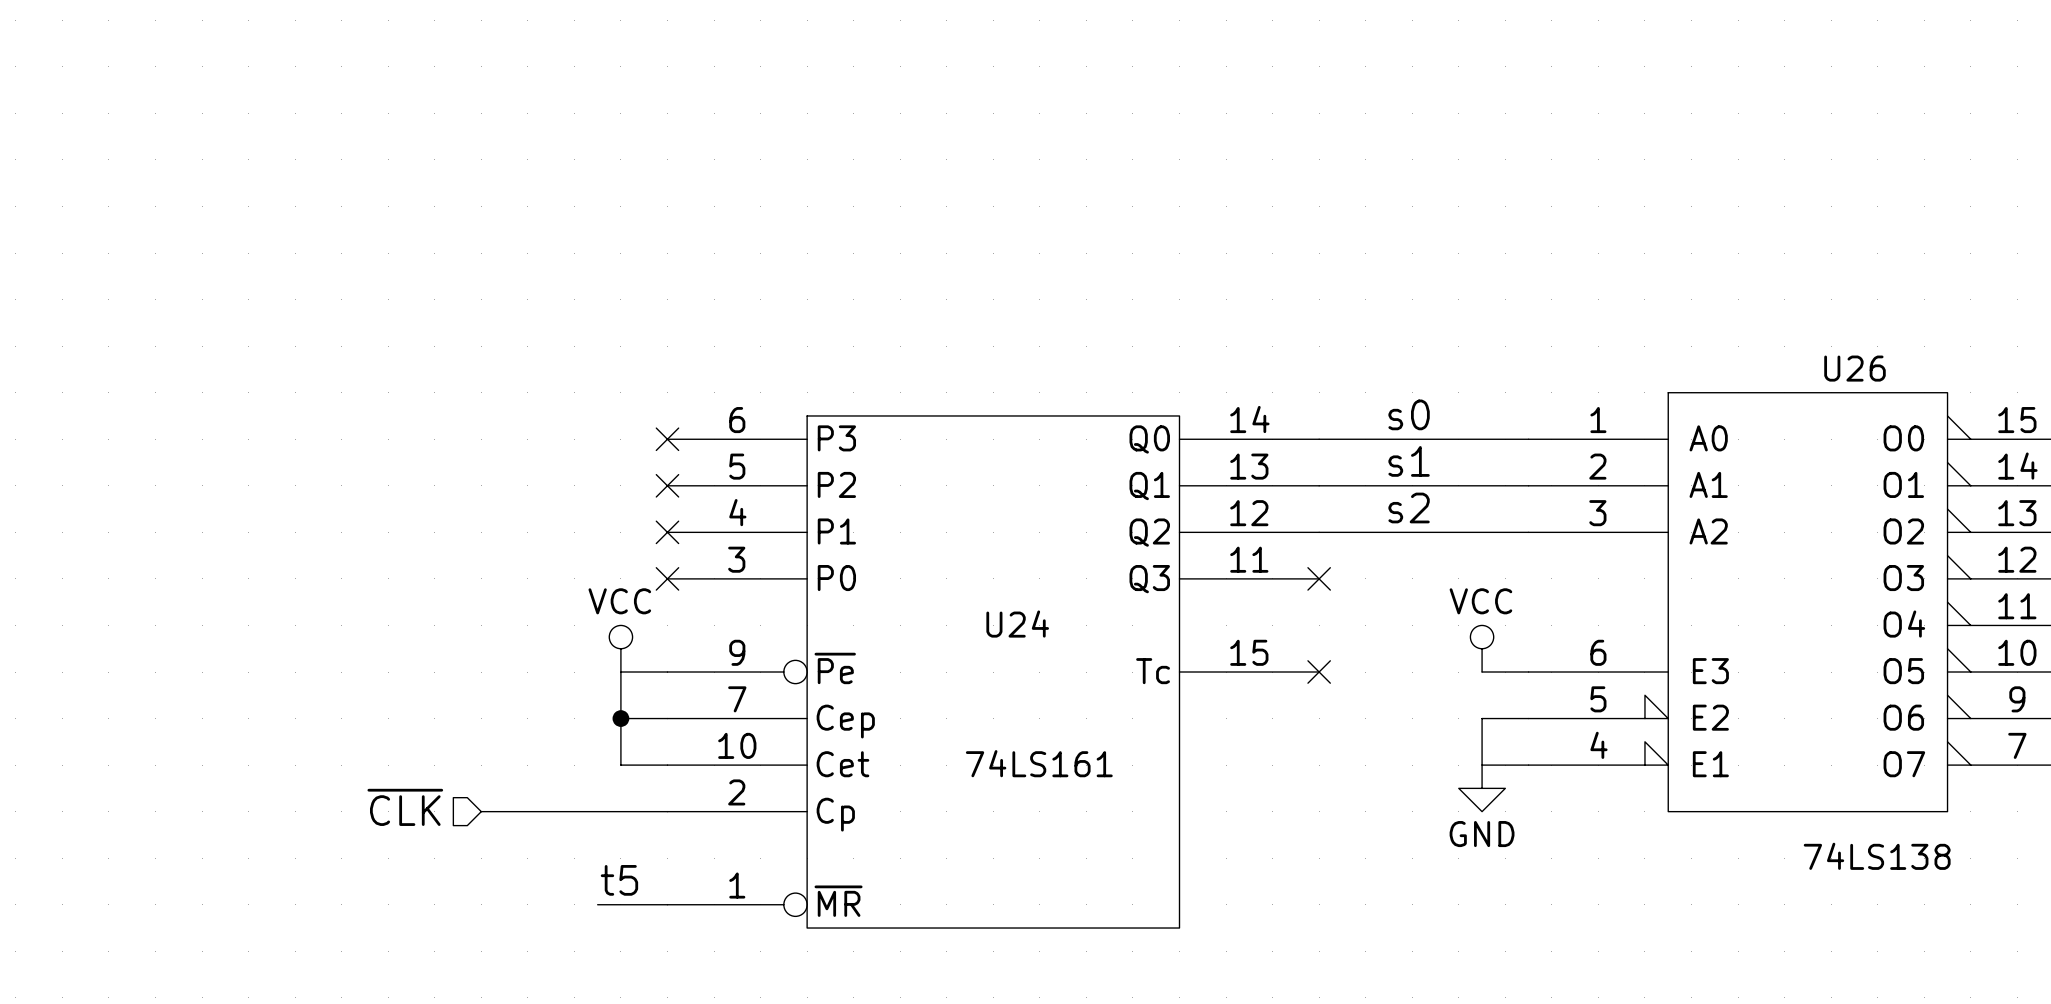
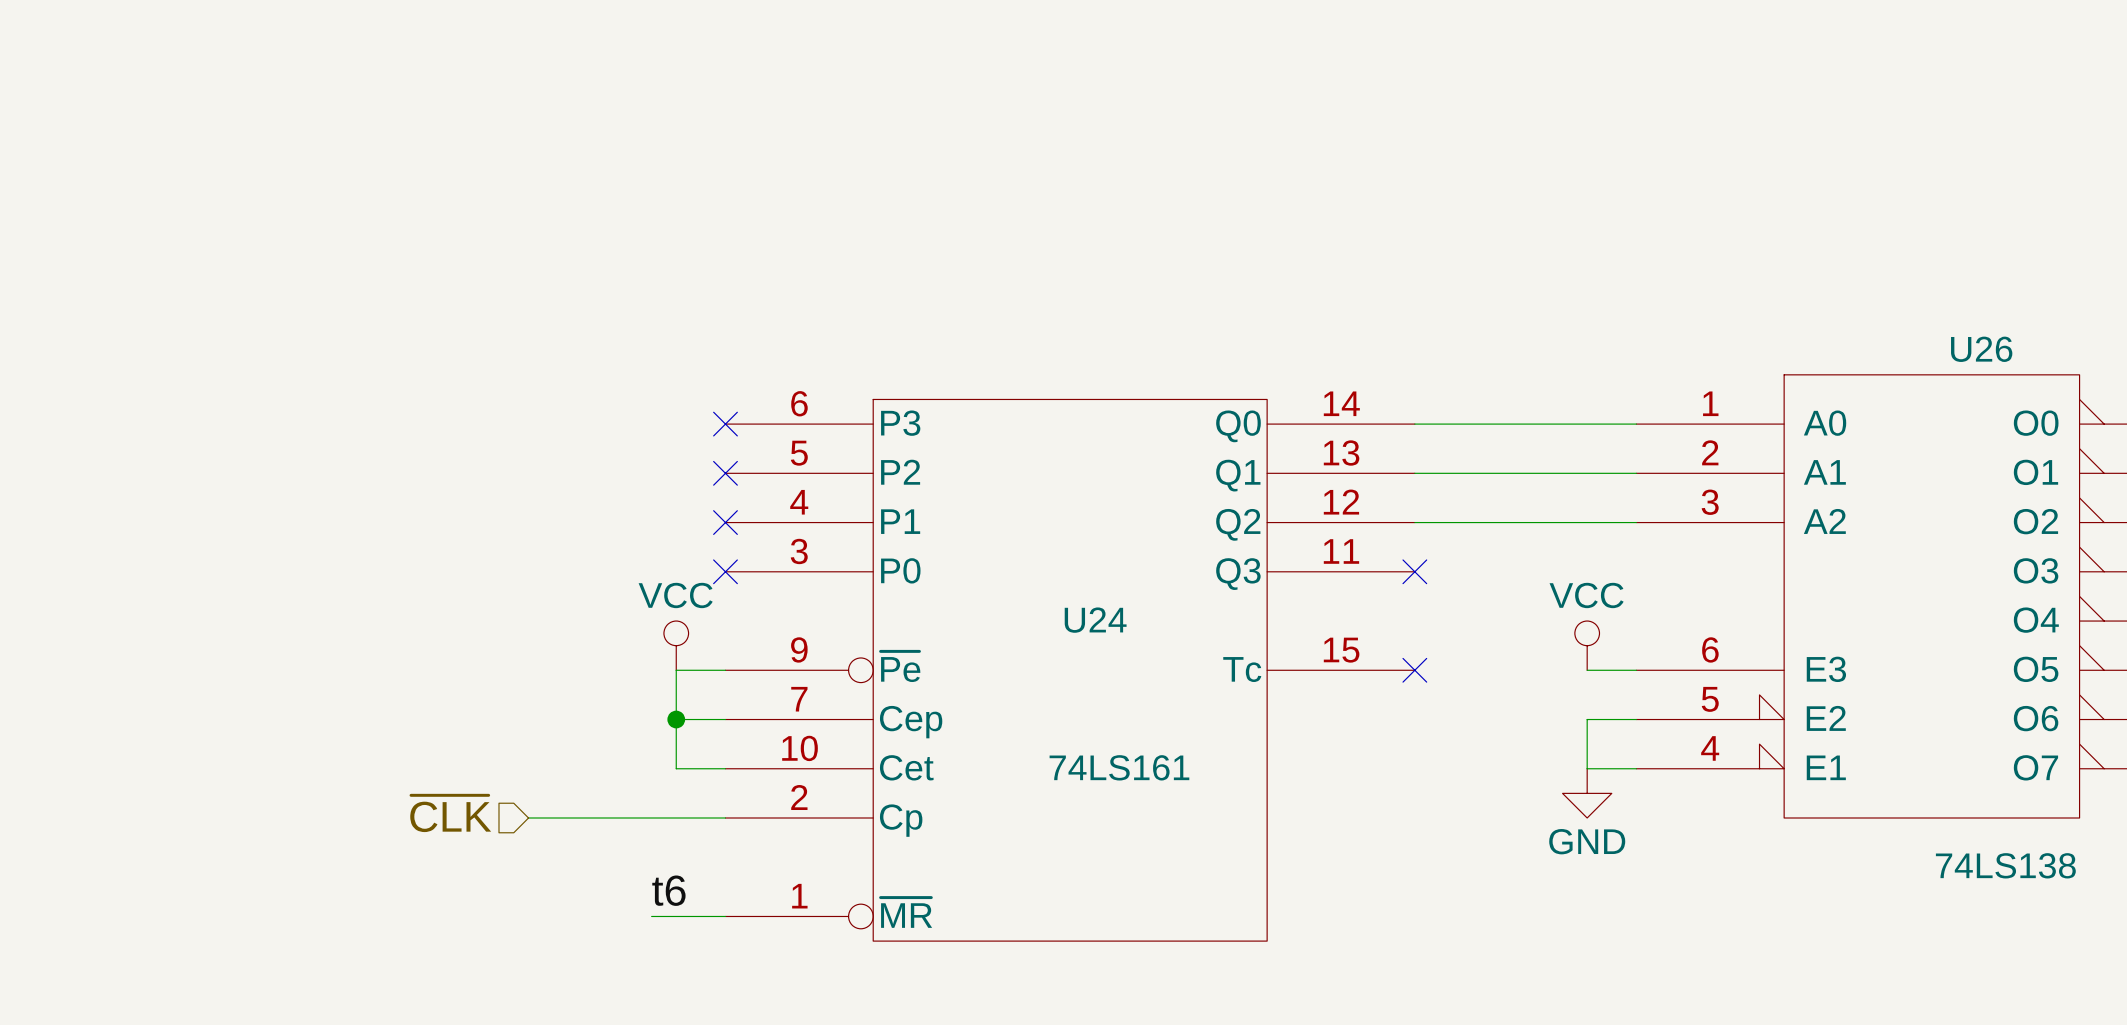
label: s0 (1409, 414) -> none
label: s1 (1409, 461) -> none
label: s2 (1409, 507) -> none
label: t5 (619, 880) -> t6 (668, 890)

